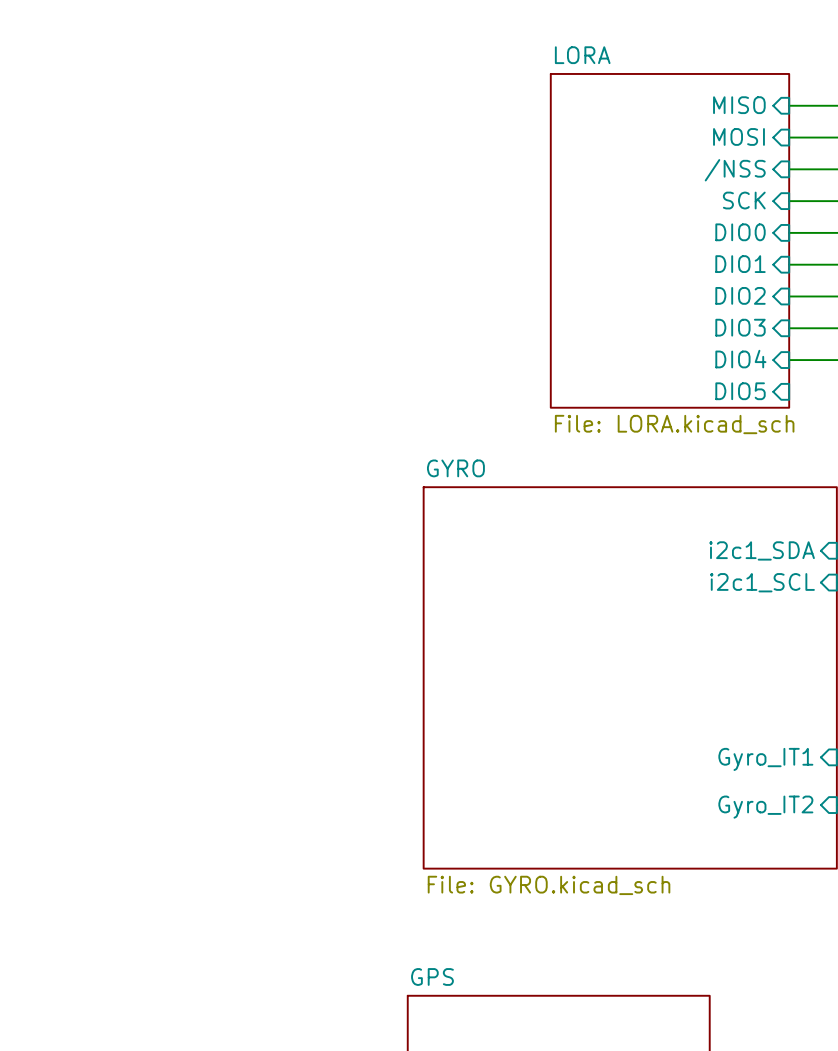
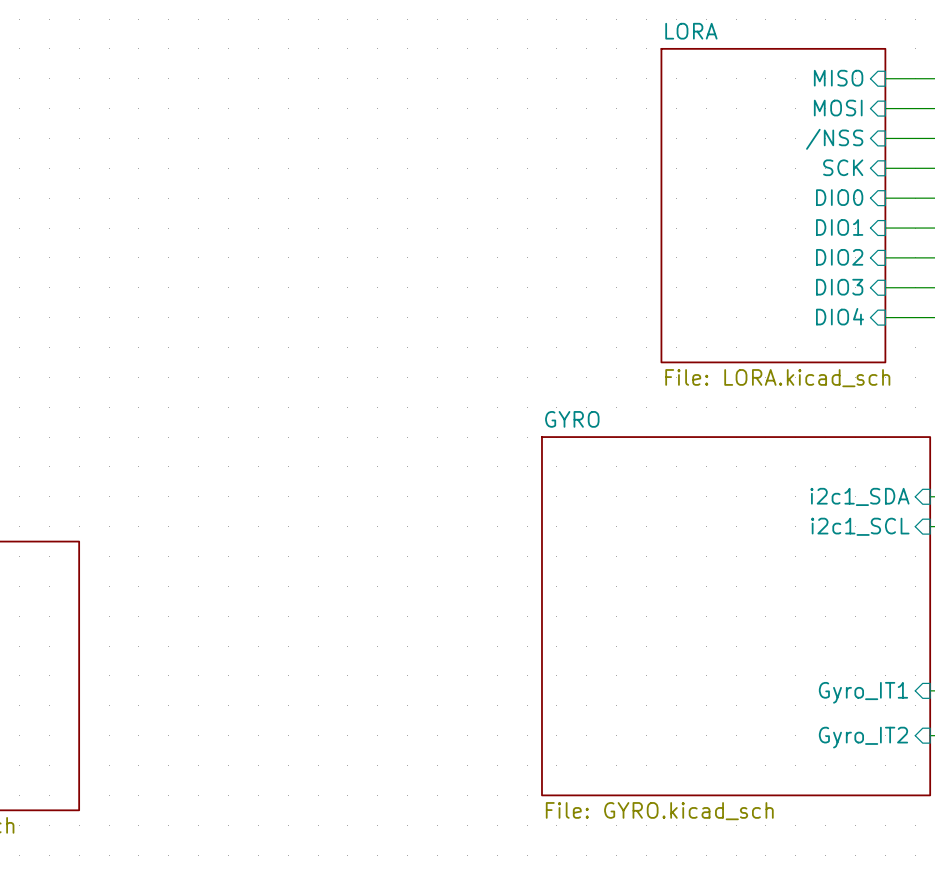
sheet pin: DIO5 (740, 391) -> none

